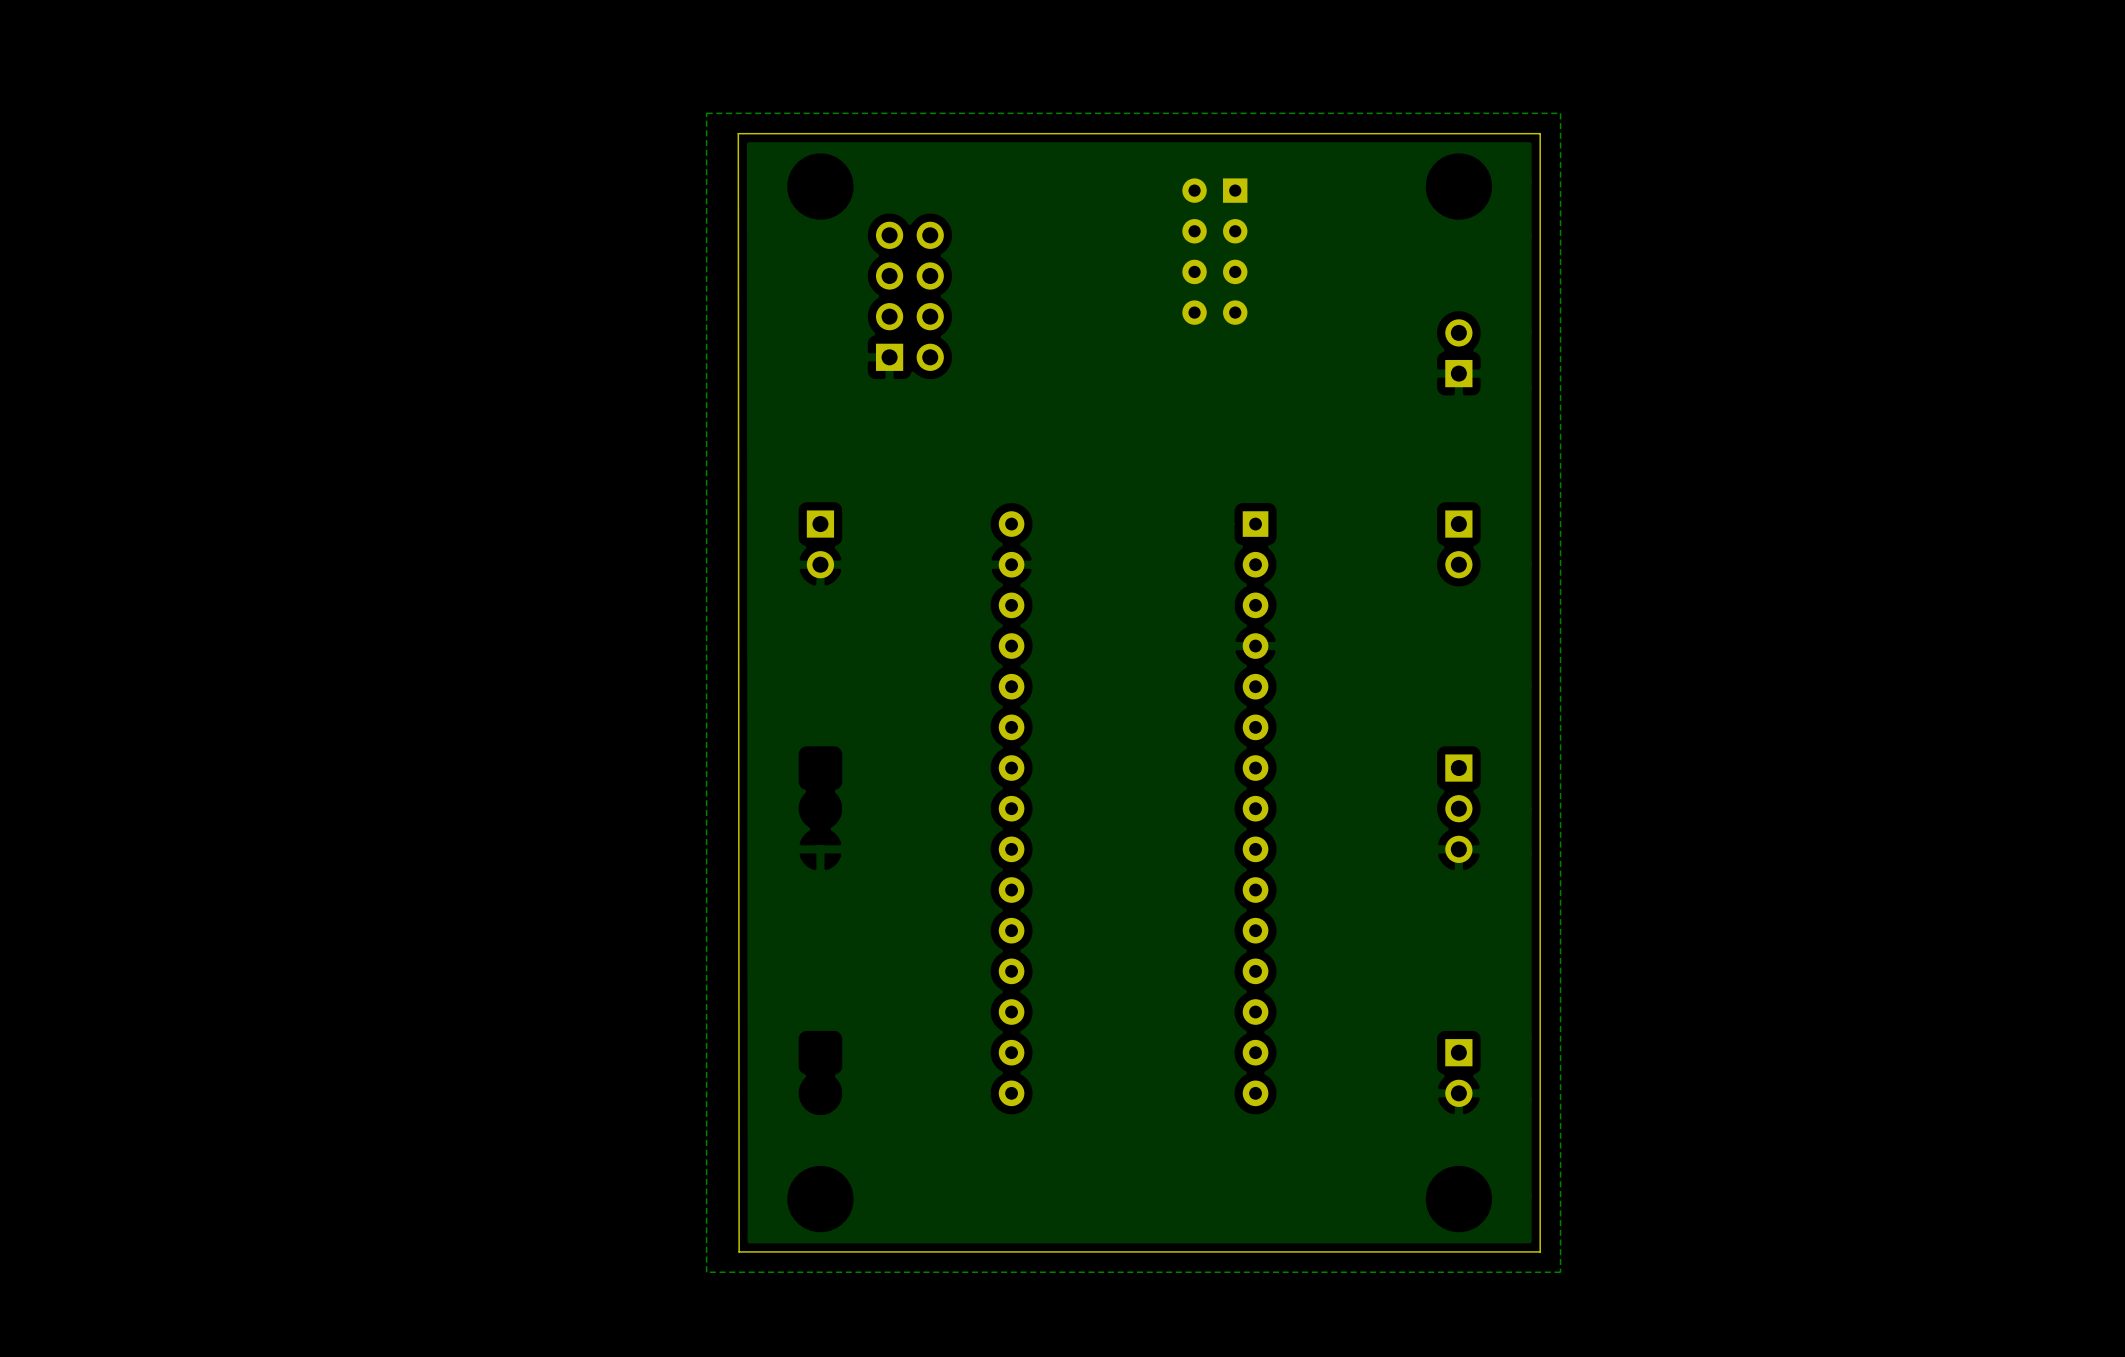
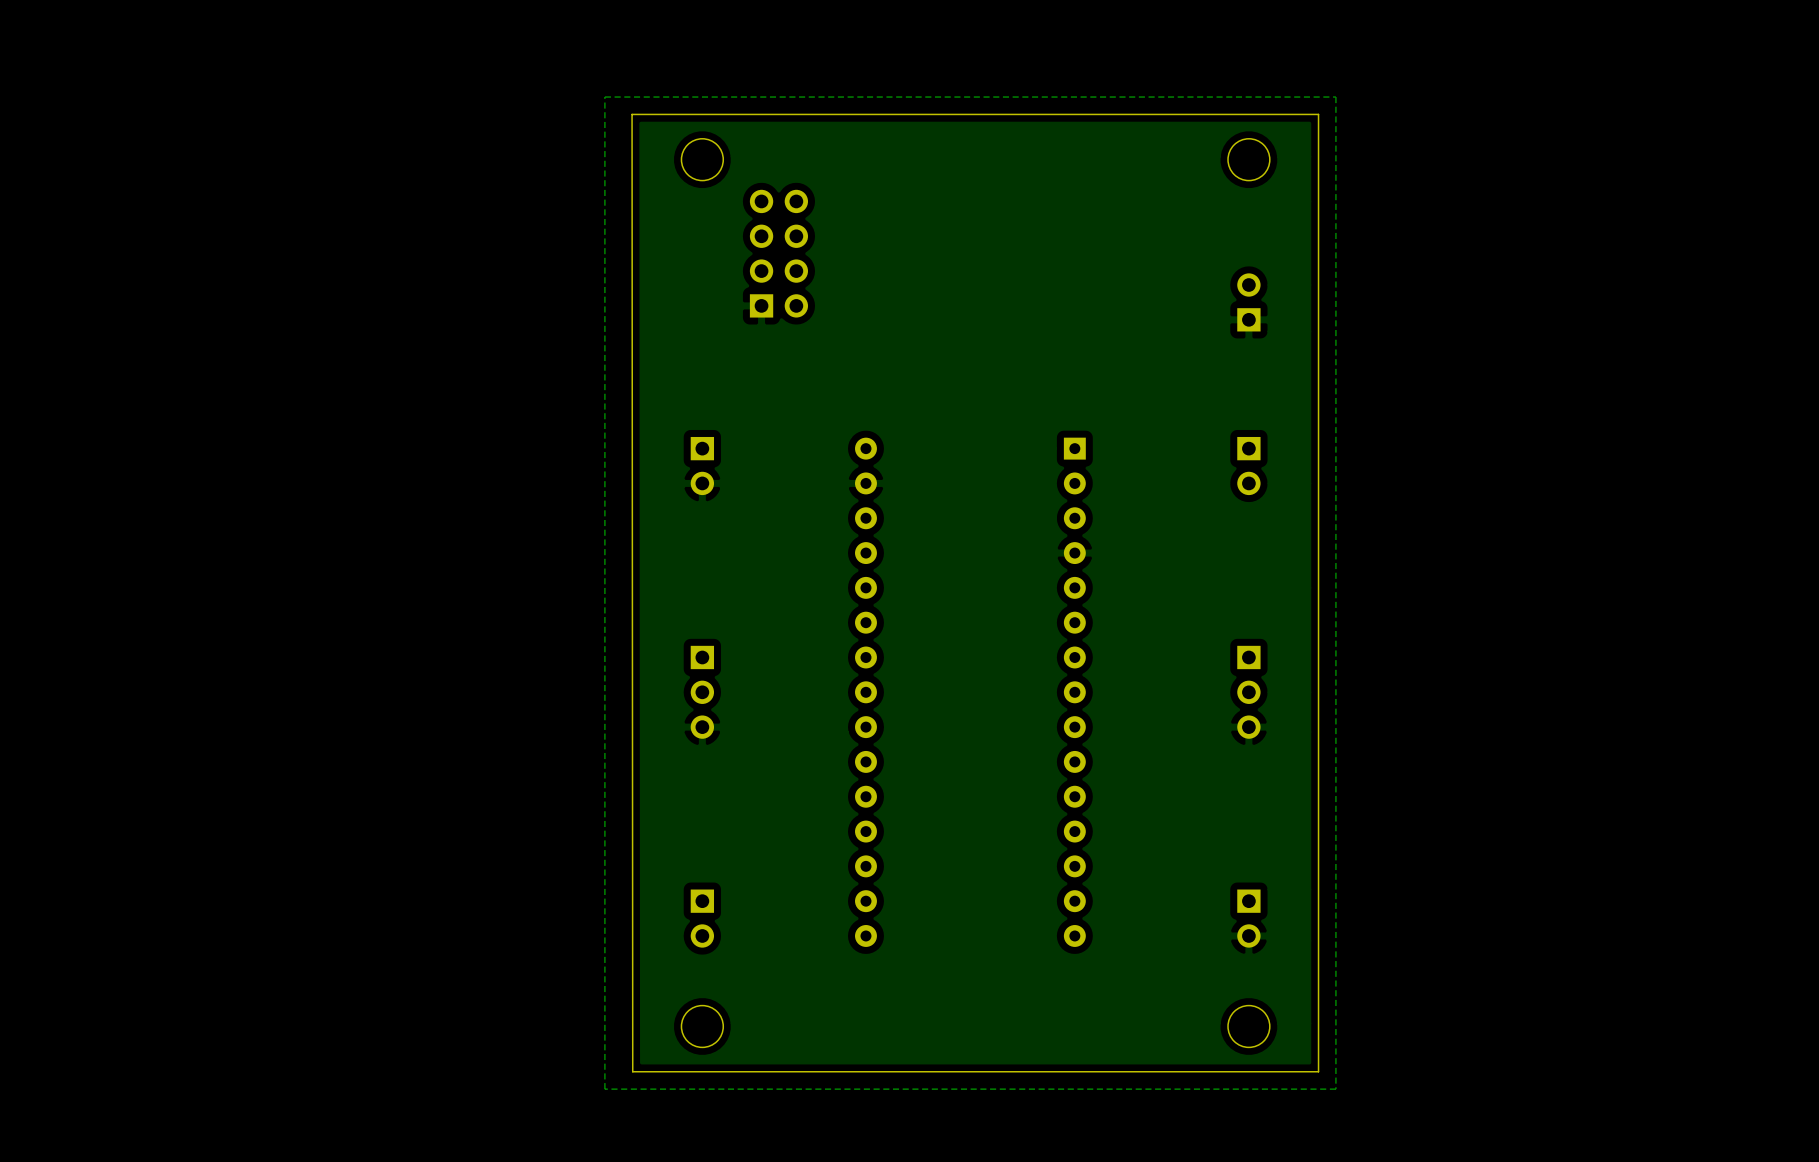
round board edge: none -> [681, 138, 724, 181]
round board edge: none -> [1227, 138, 1271, 181]
part: (1214, 251) -> none
part: none -> (702, 692)
part: none -> (702, 918)
round board edge: none -> [681, 1005, 724, 1048]
round board edge: none -> [1227, 1005, 1271, 1048]

